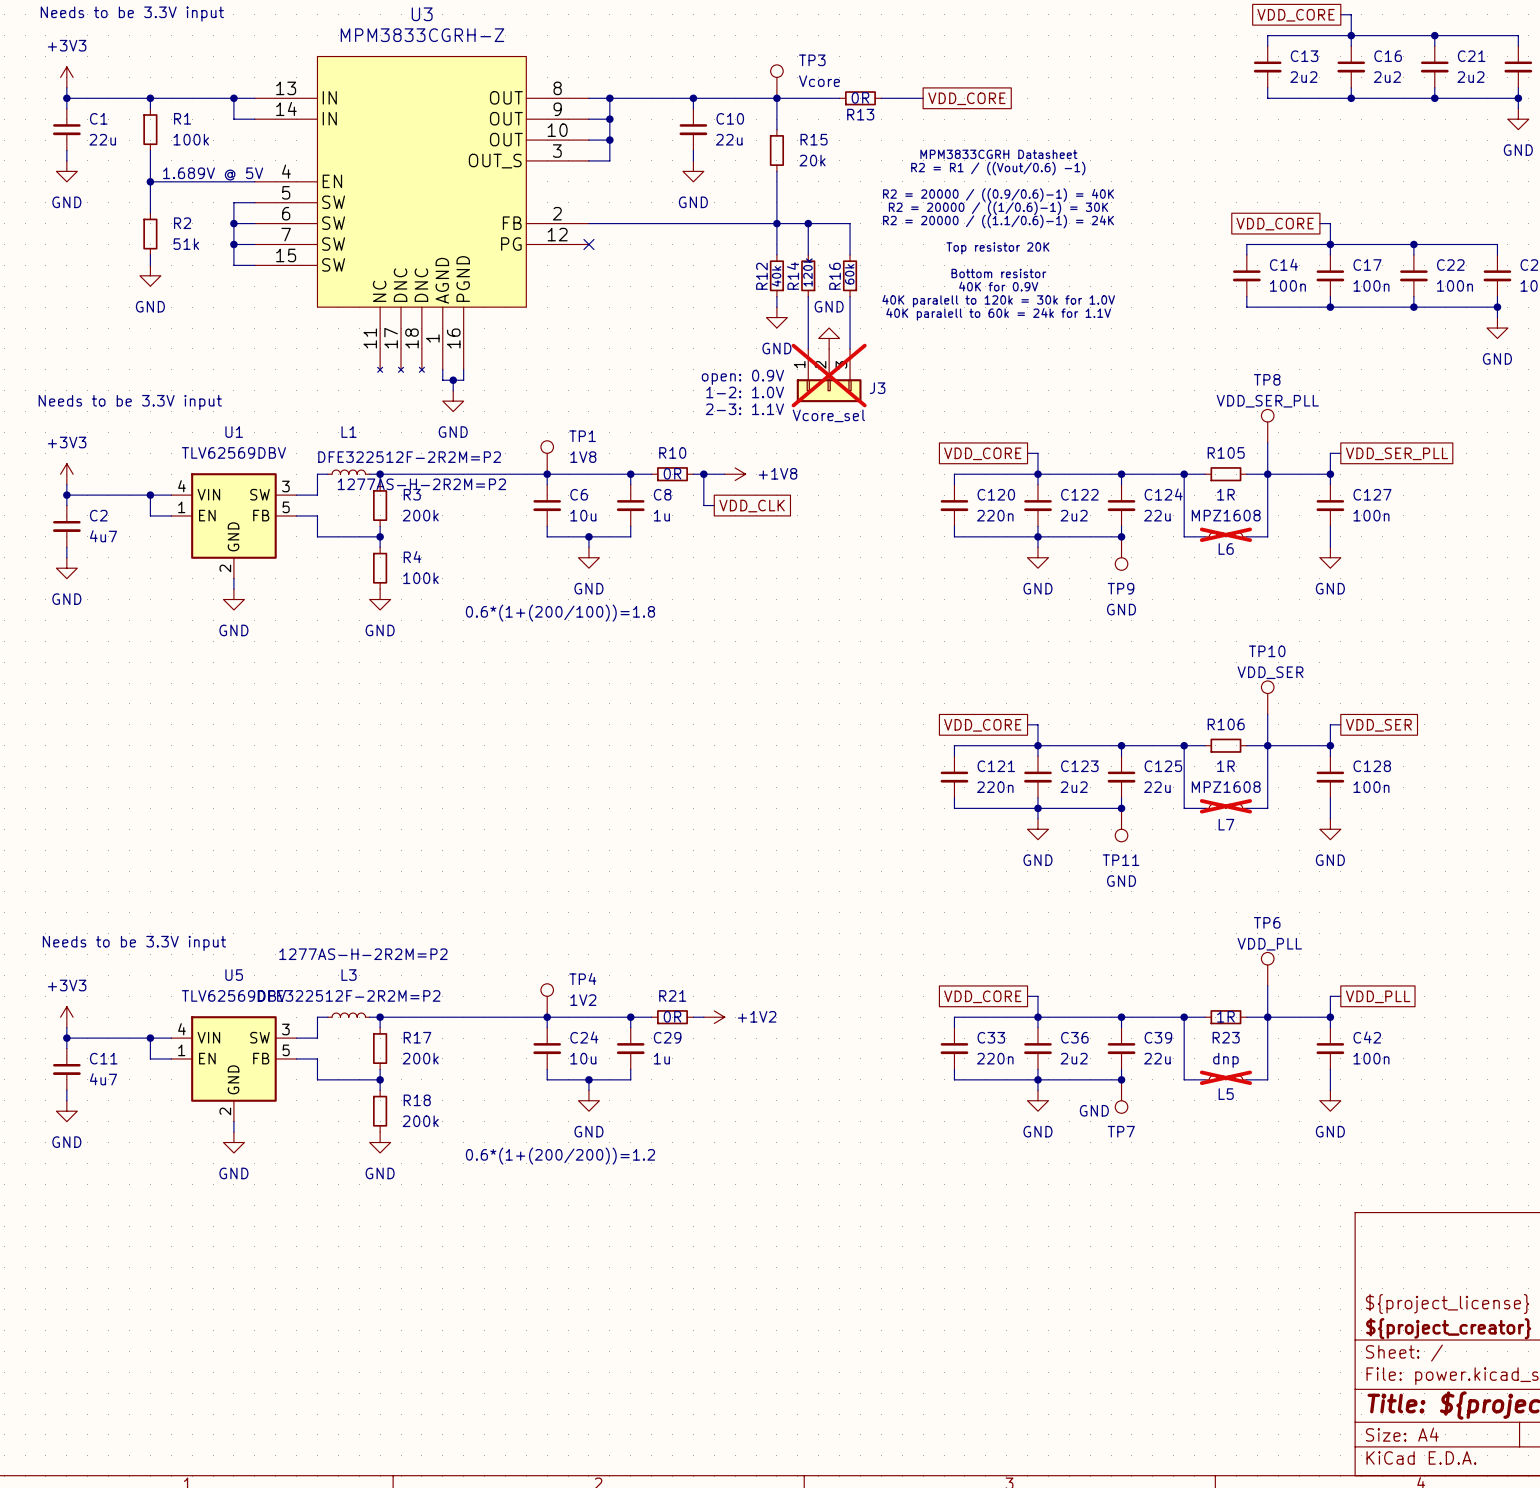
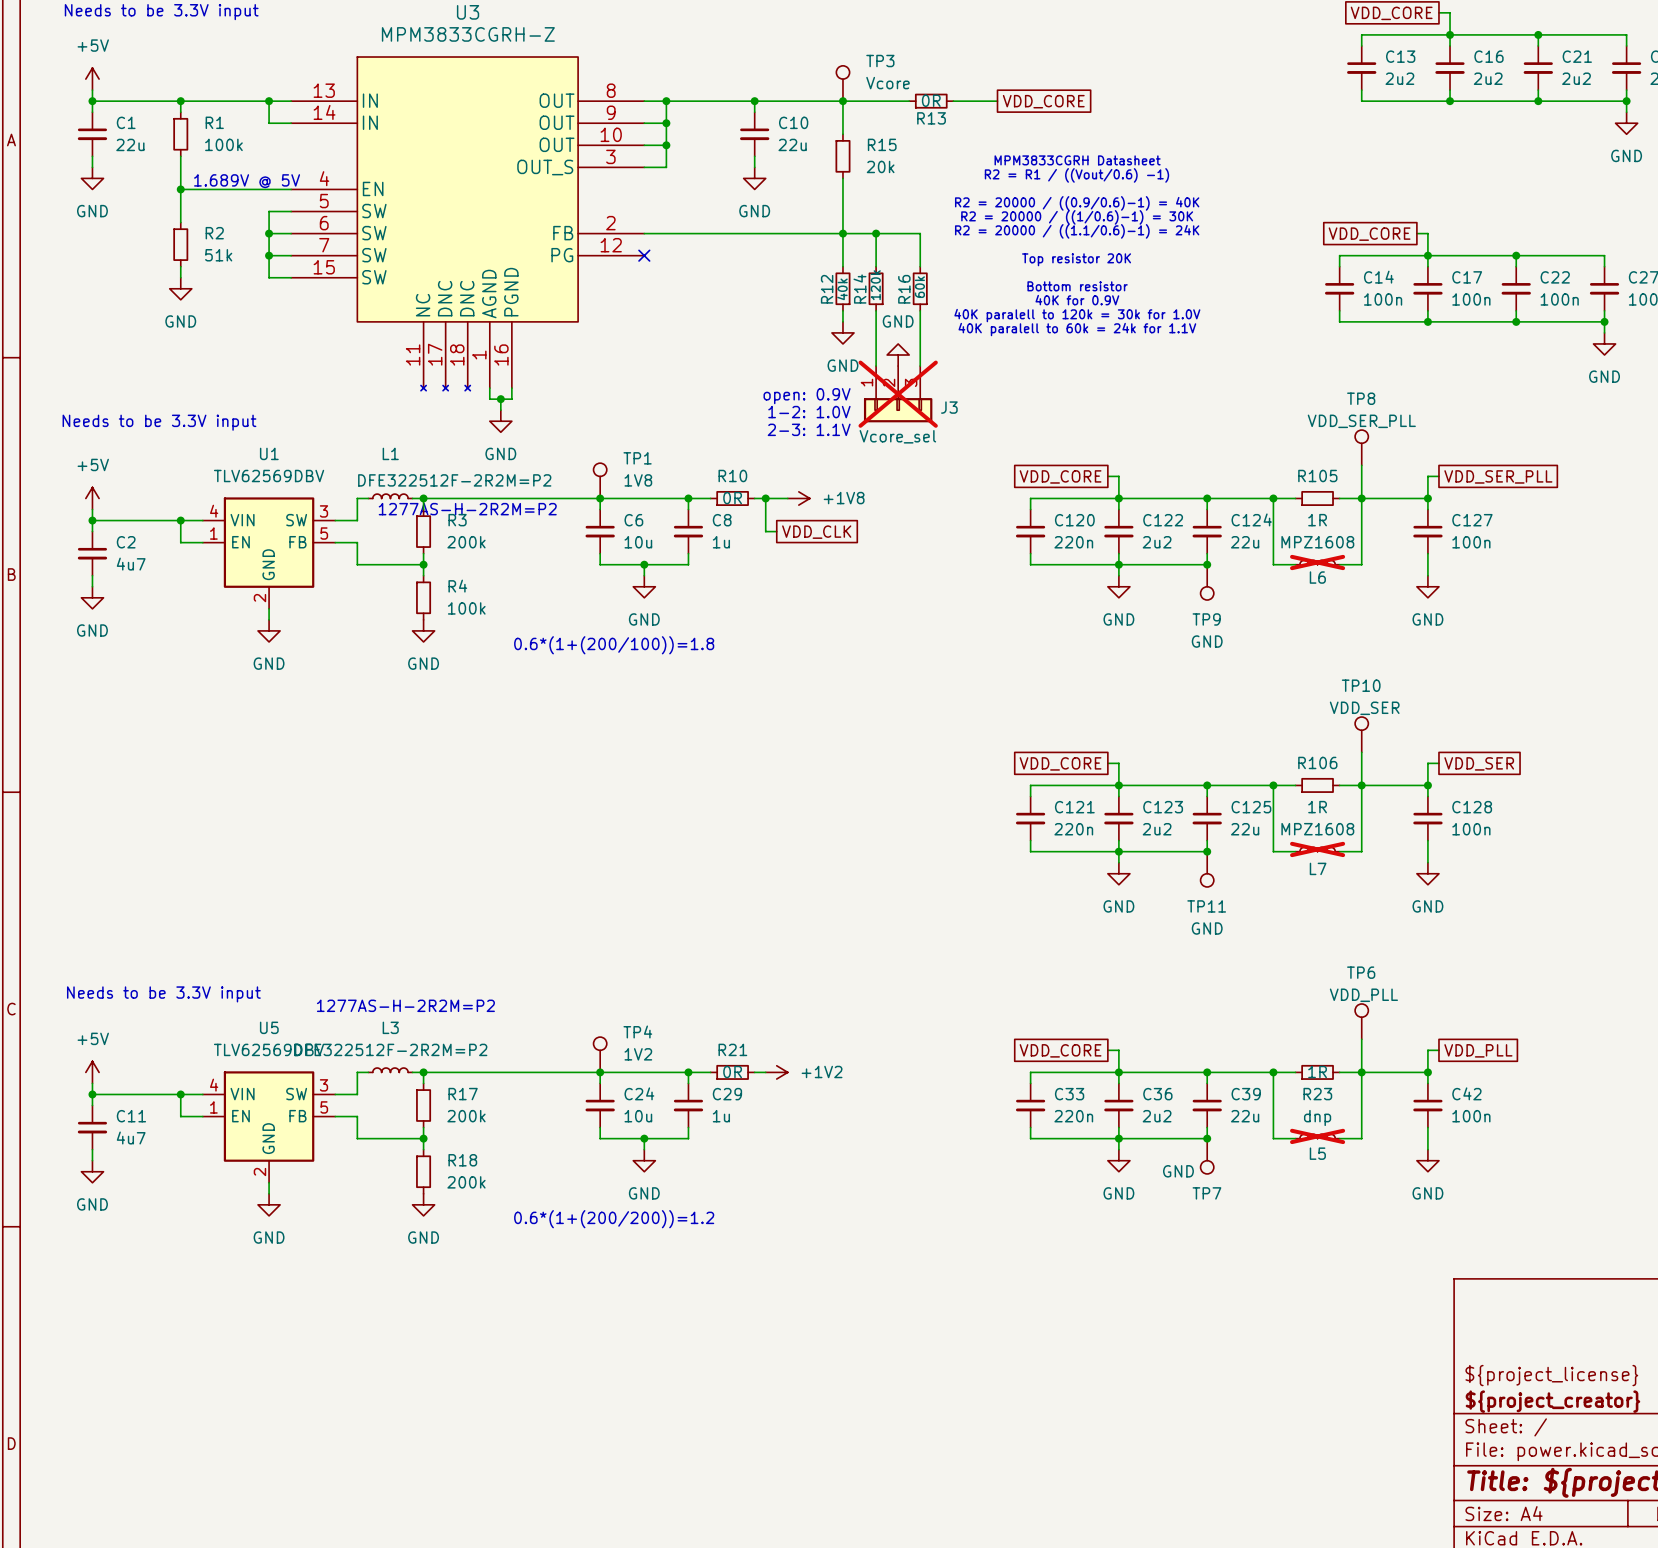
power symbol: +3V3 (66, 77) -> +5V (92, 79)
power symbol: +3V3 (66, 474) -> +5V (92, 498)
power symbol: +3V3 (66, 1017) -> +5V (92, 1072)

